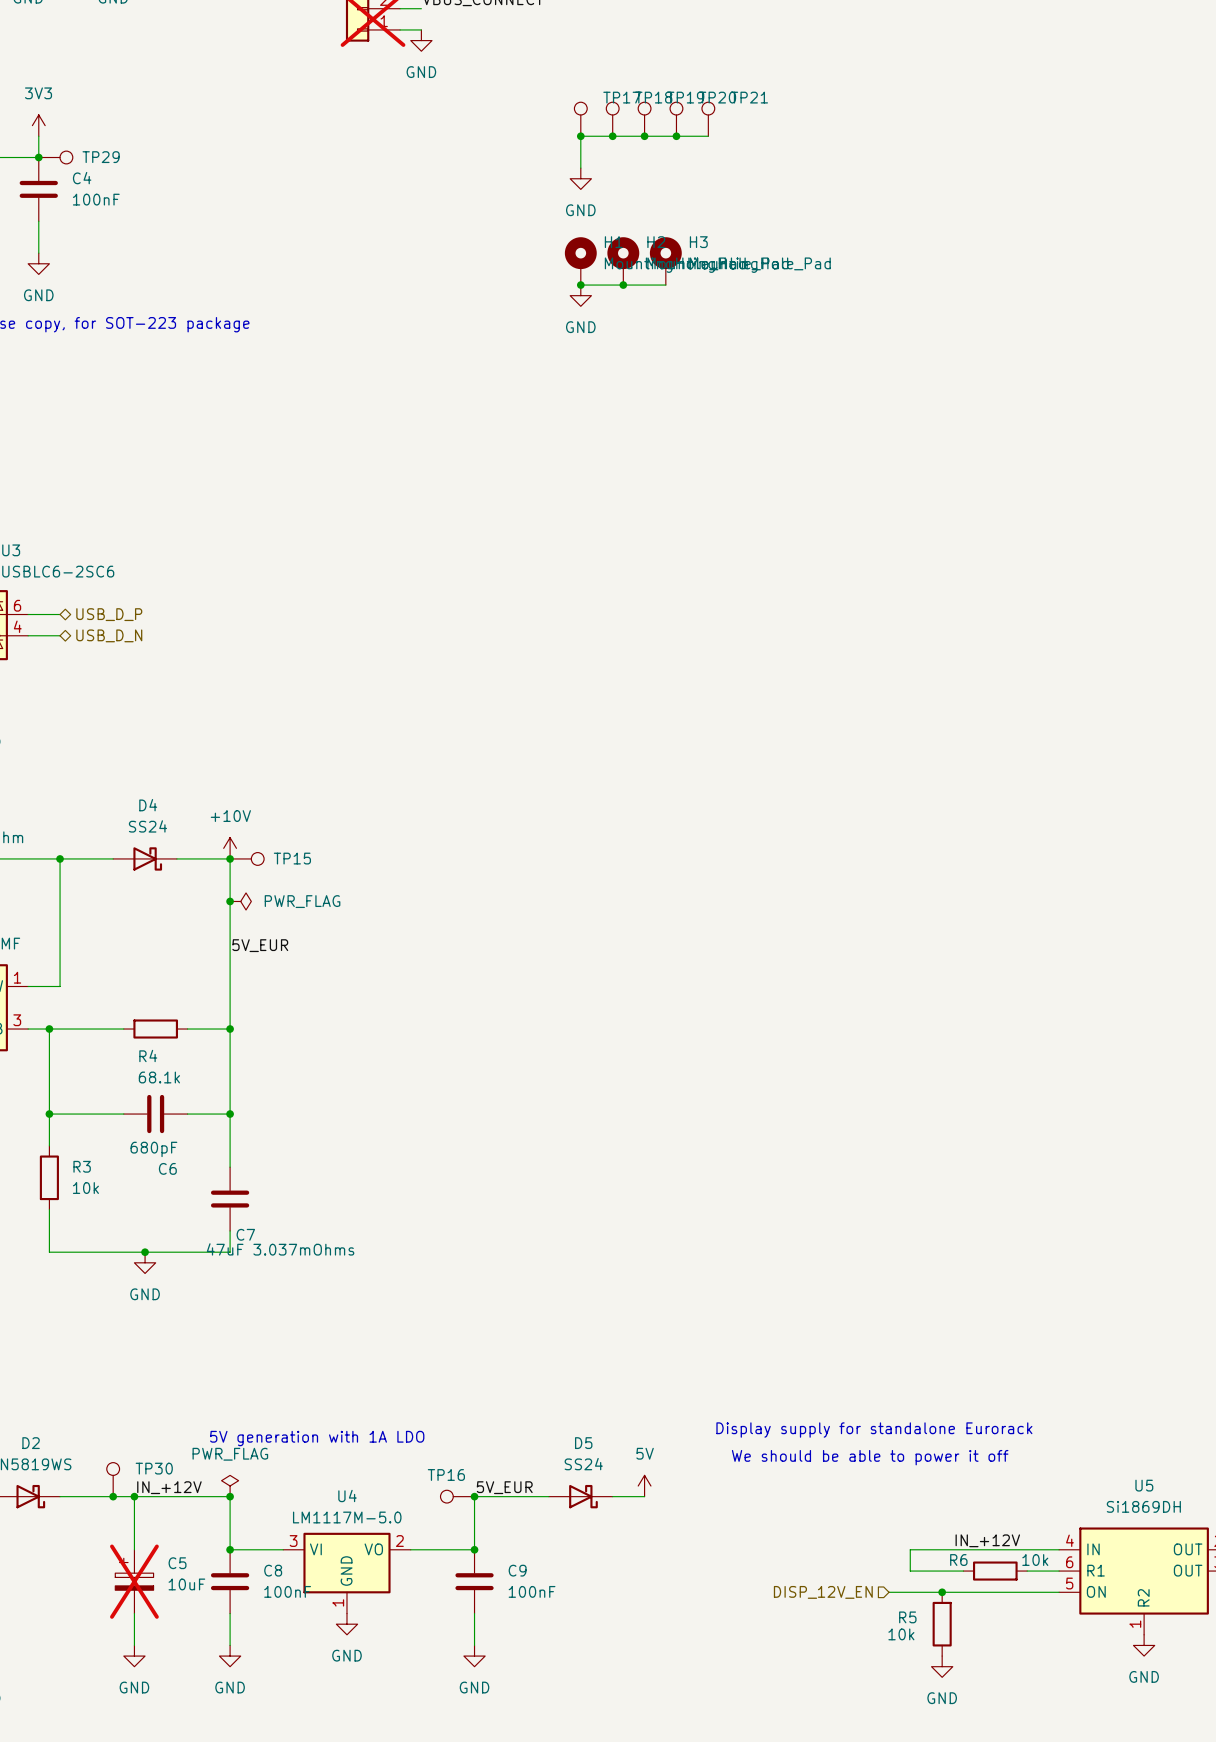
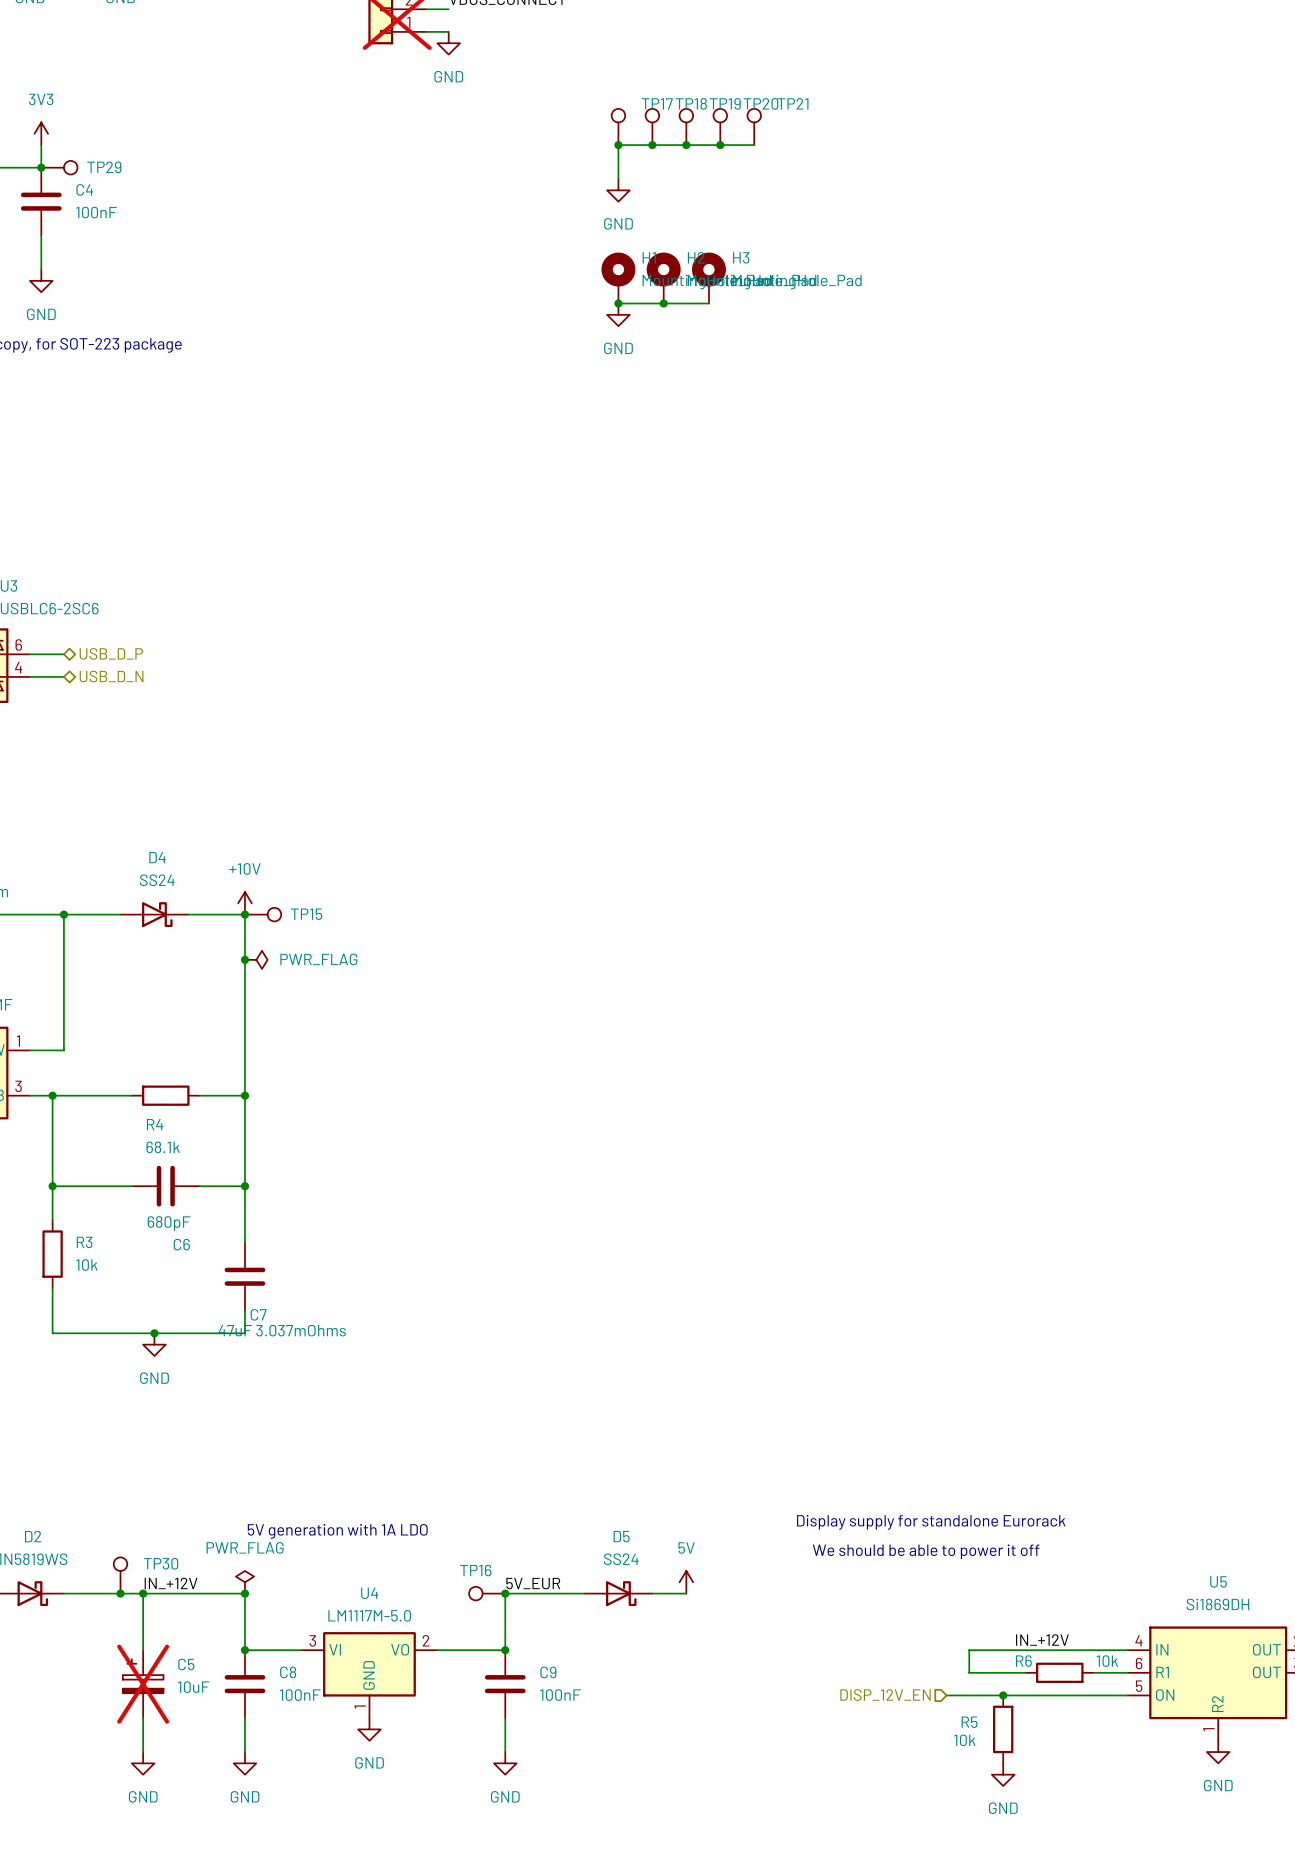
label: 5V_EUR (260, 945) -> none

